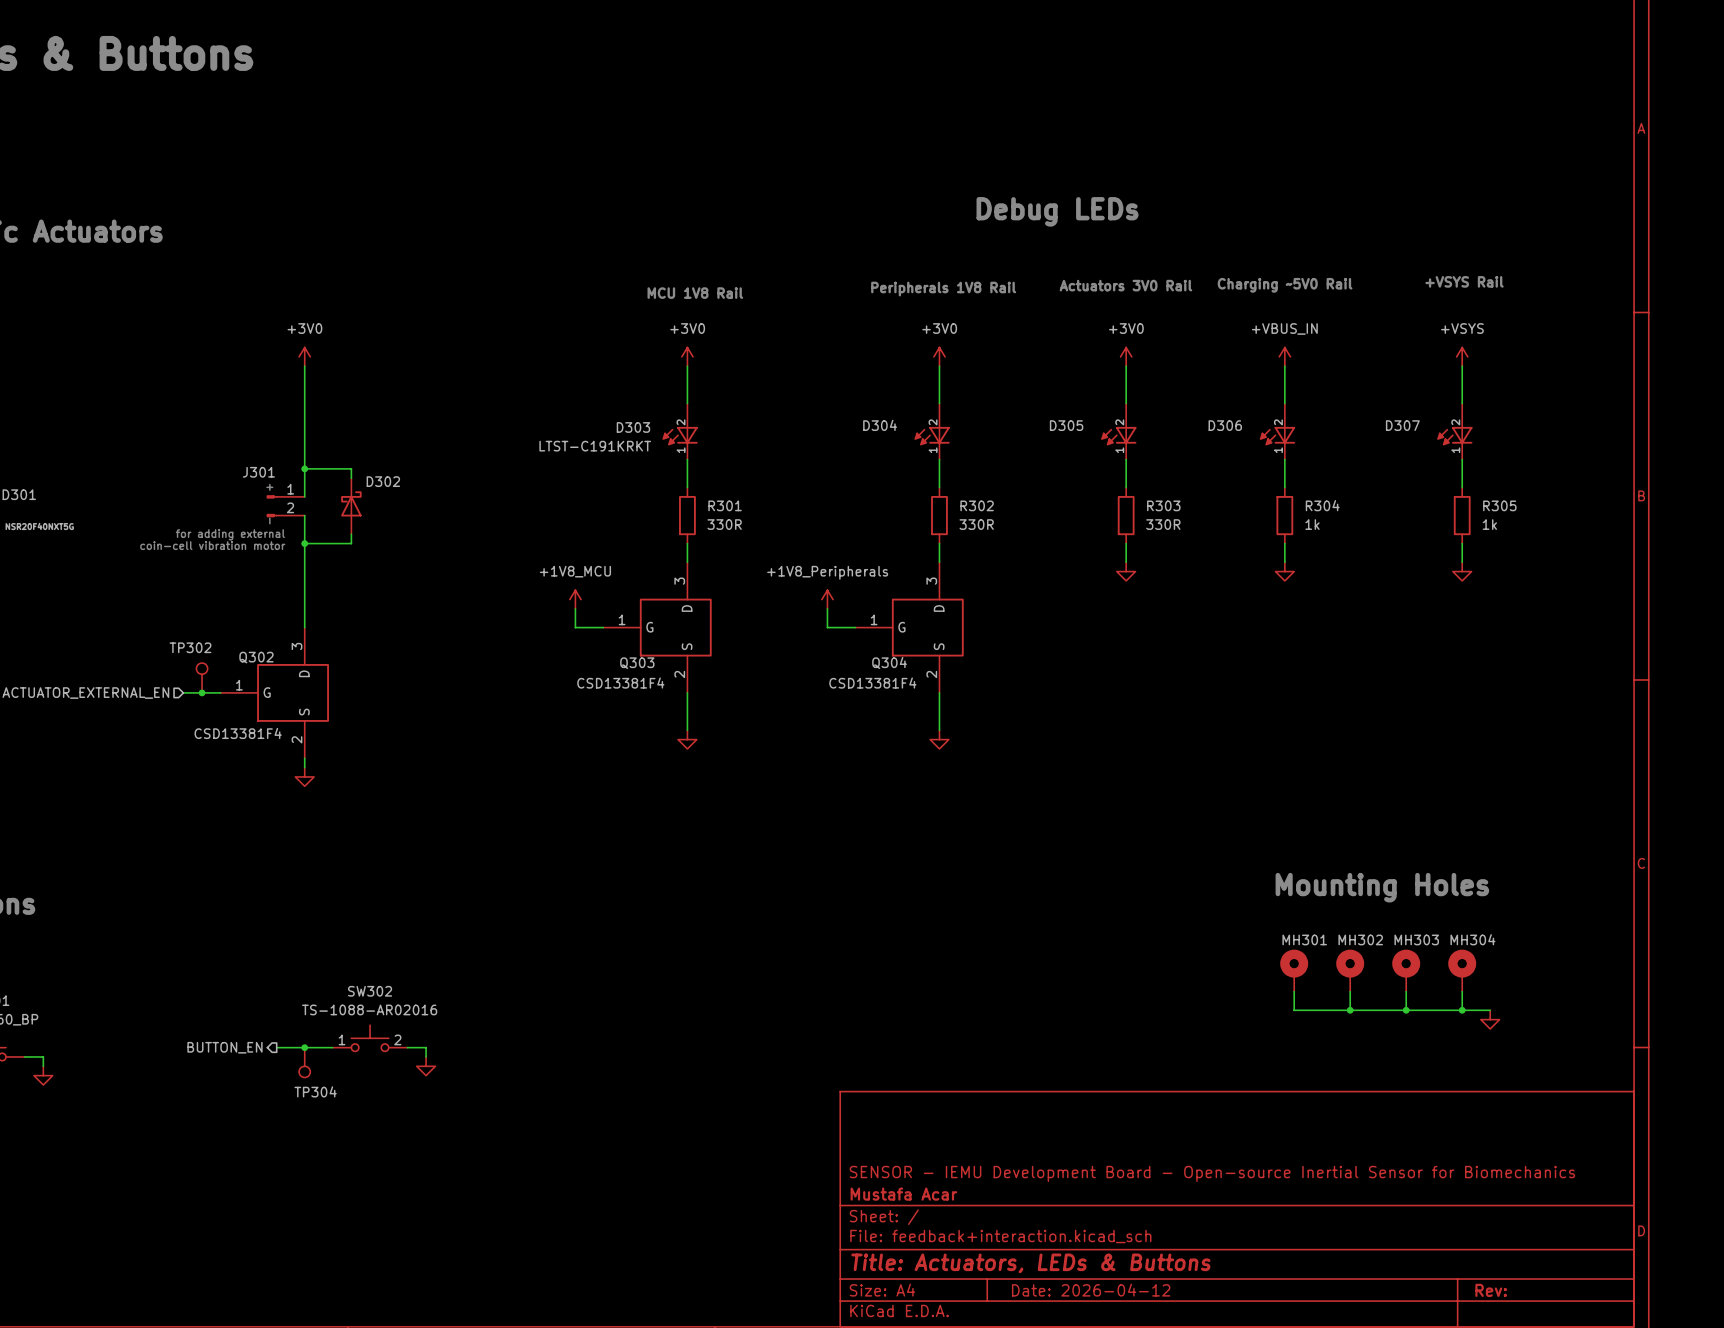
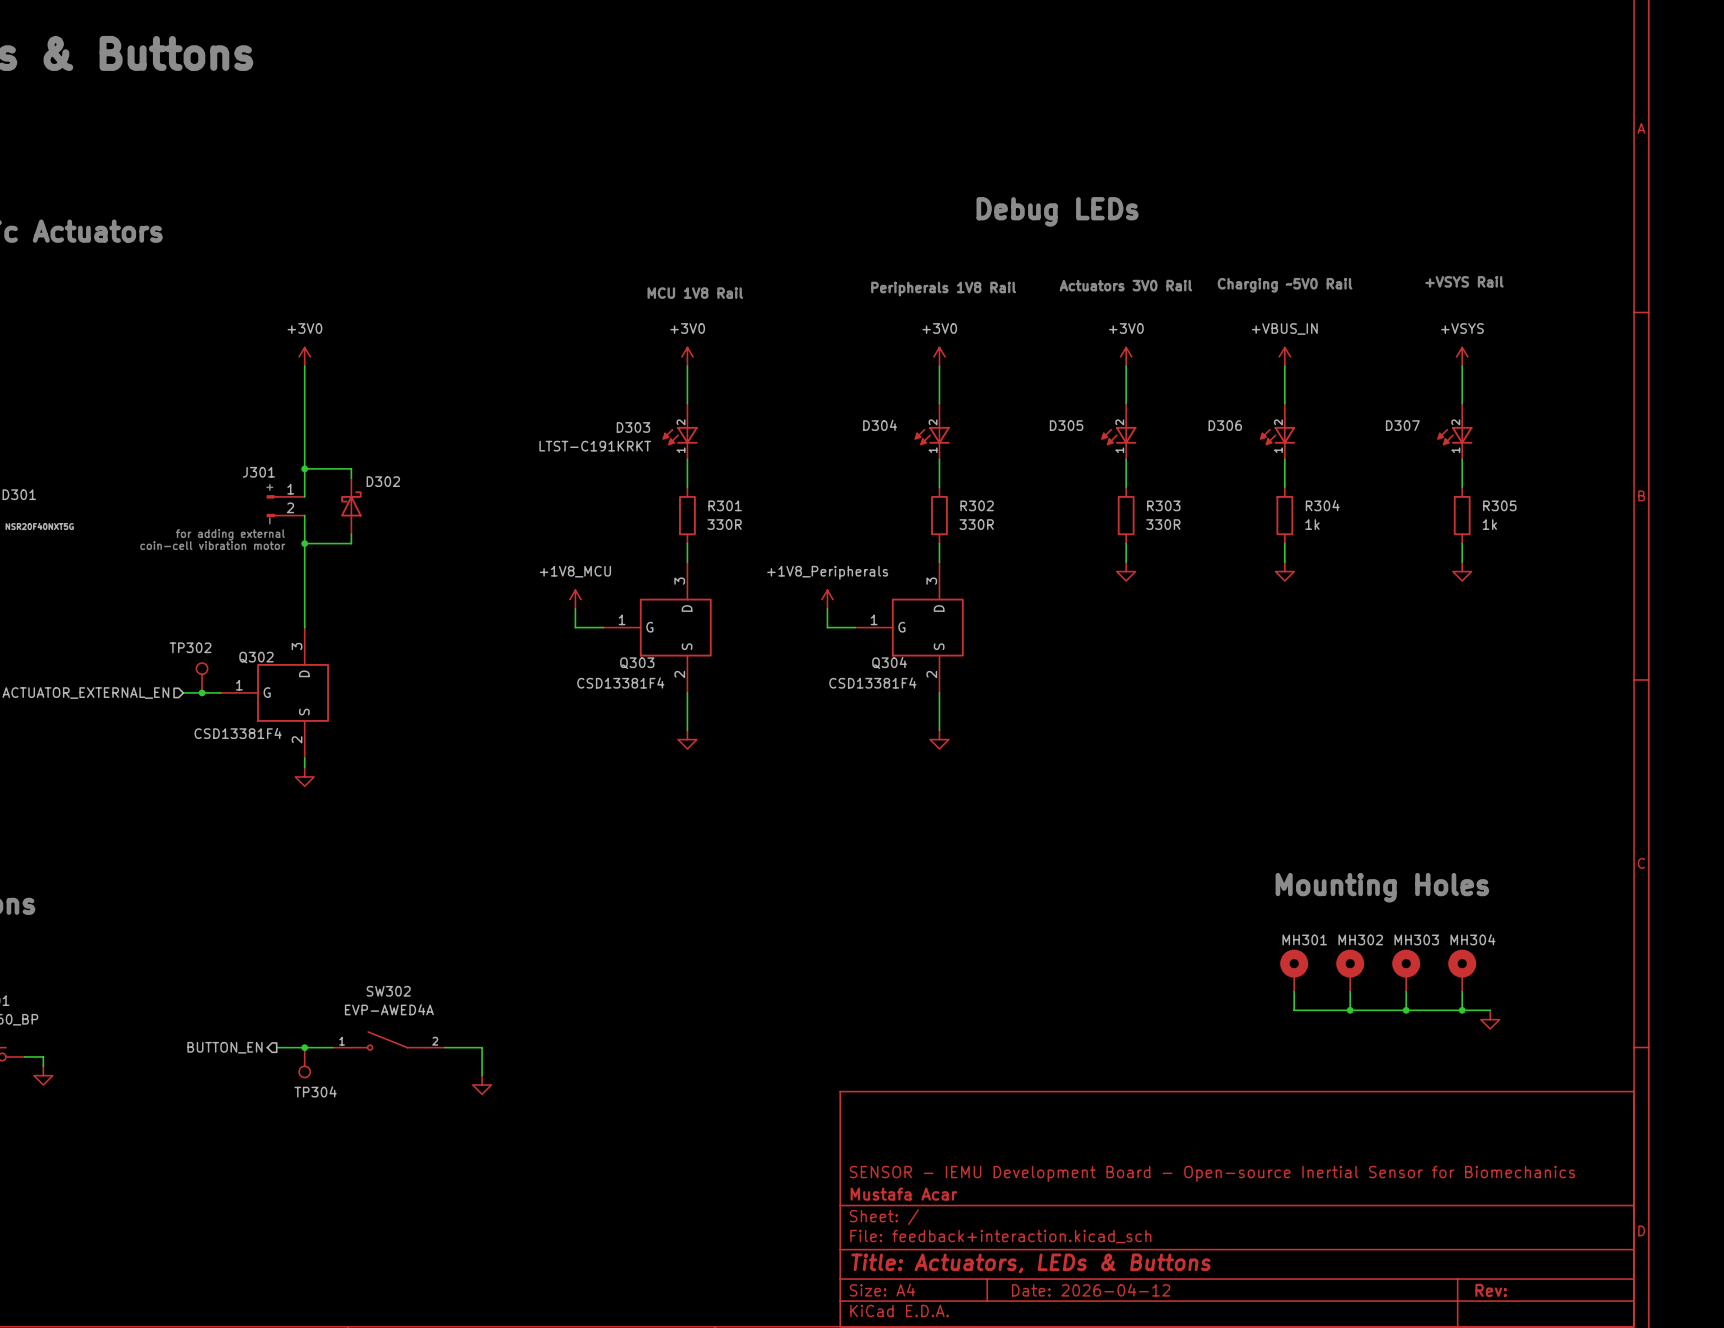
SW302 value: TS-1088-AR02016 (369, 1009) -> EVP-AWED4A (389, 1009)
SW302 symbol: [332, 1025, 408, 1052] -> [332, 1031, 445, 1051]
wire: none -> (444, 1047) (482, 1047) (482, 1075)
power symbol position: (426, 1066) -> (482, 1084)

